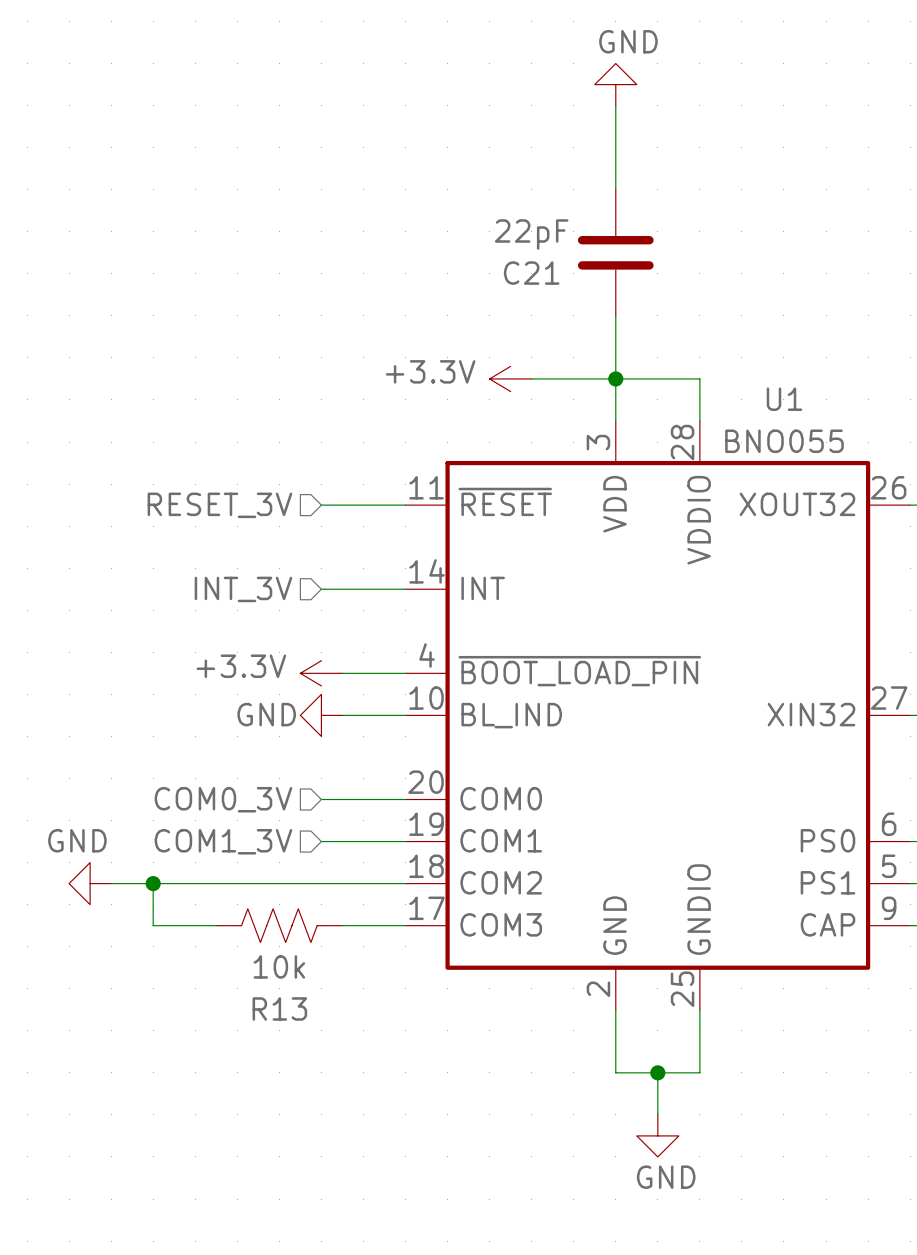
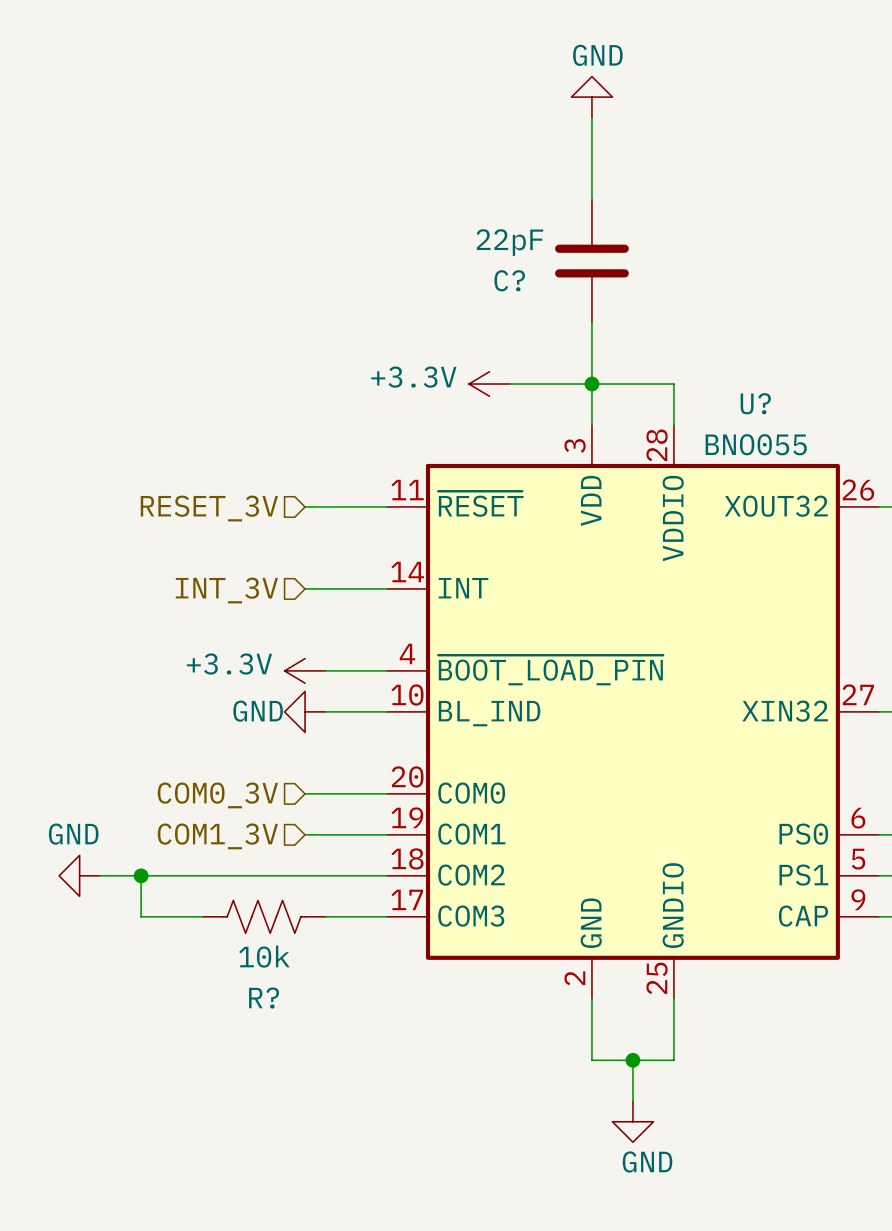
C21 name: C21 (531, 273) -> C? (509, 280)
U1 name: U1 (784, 399) -> U? (755, 403)
R13 name: R13 (279, 1008) -> R? (264, 998)

